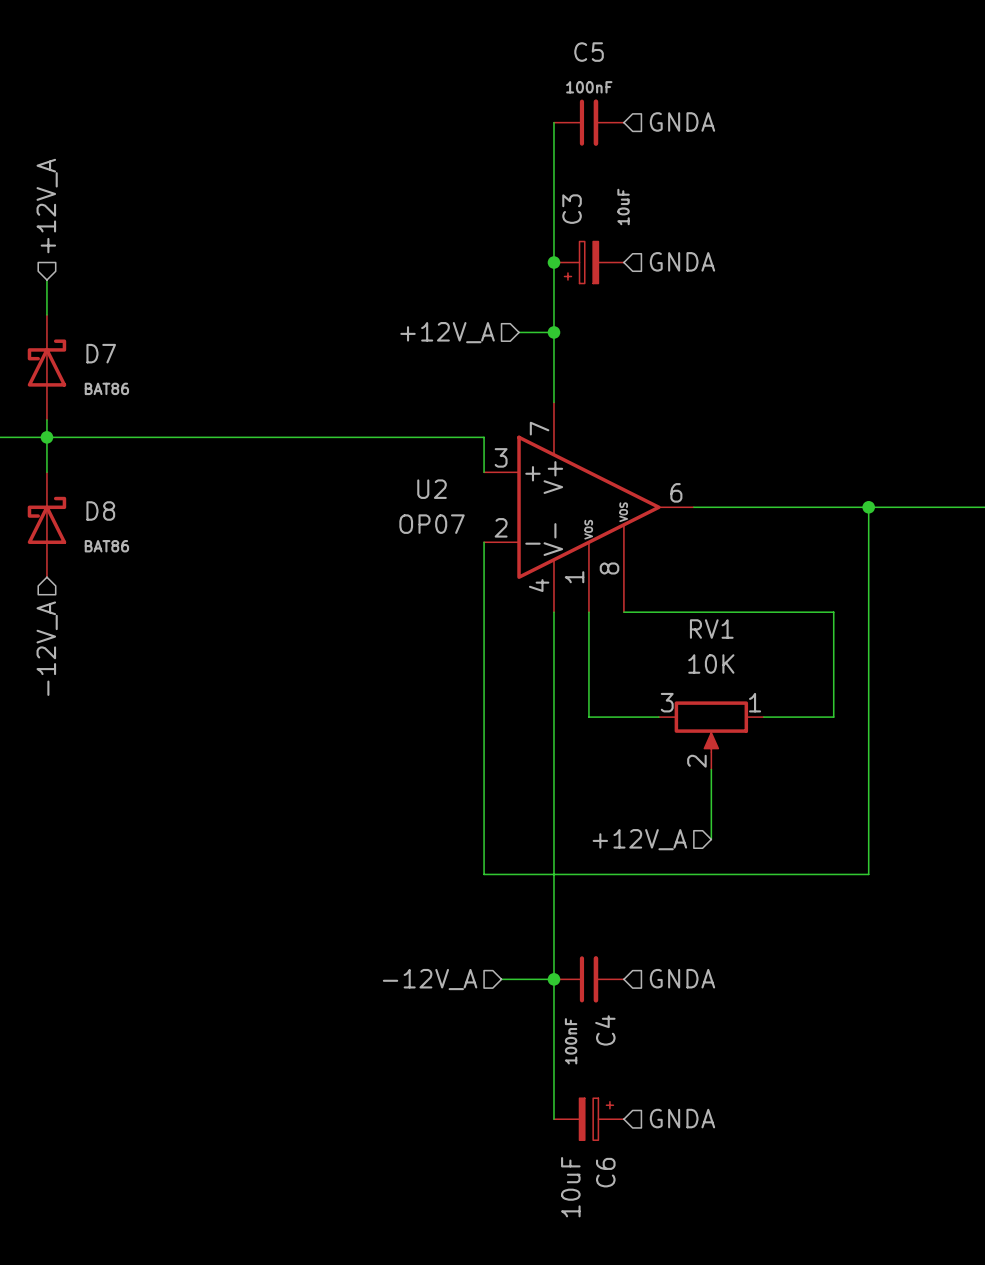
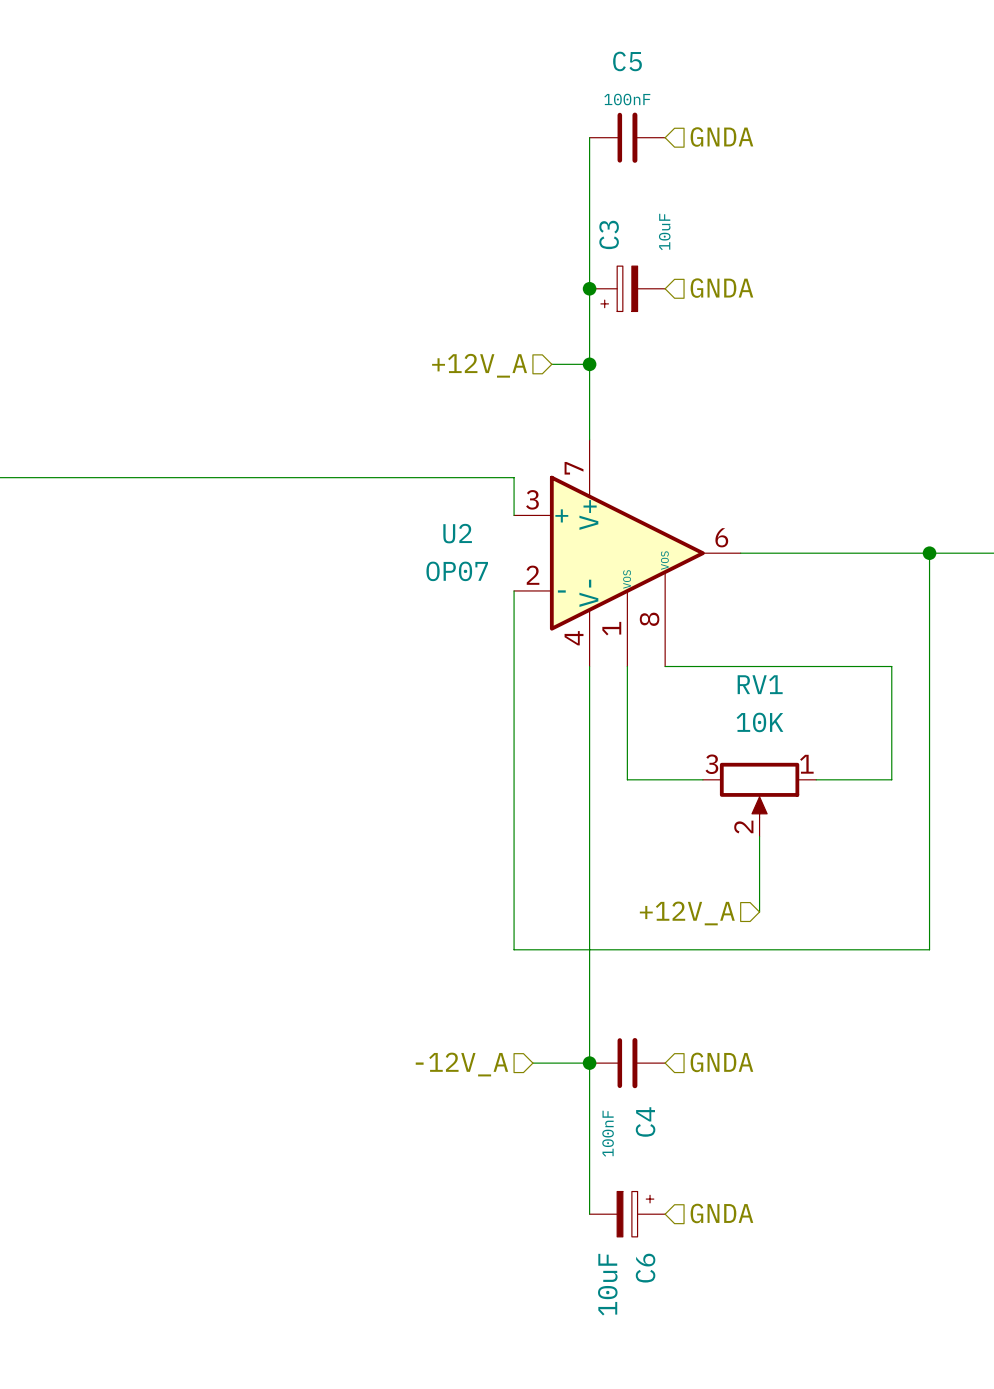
hierarchical label: +12V_A (47, 206) -> none
wire: (46, 280) (46, 314) -> none
D7: BAT86 (46, 367) -> none
wire: (46, 419) (46, 472) -> none
junction: (46, 437) -> none
D8: BAT86 (46, 524) -> none
hierarchical label: -12V_A (47, 648) -> none

